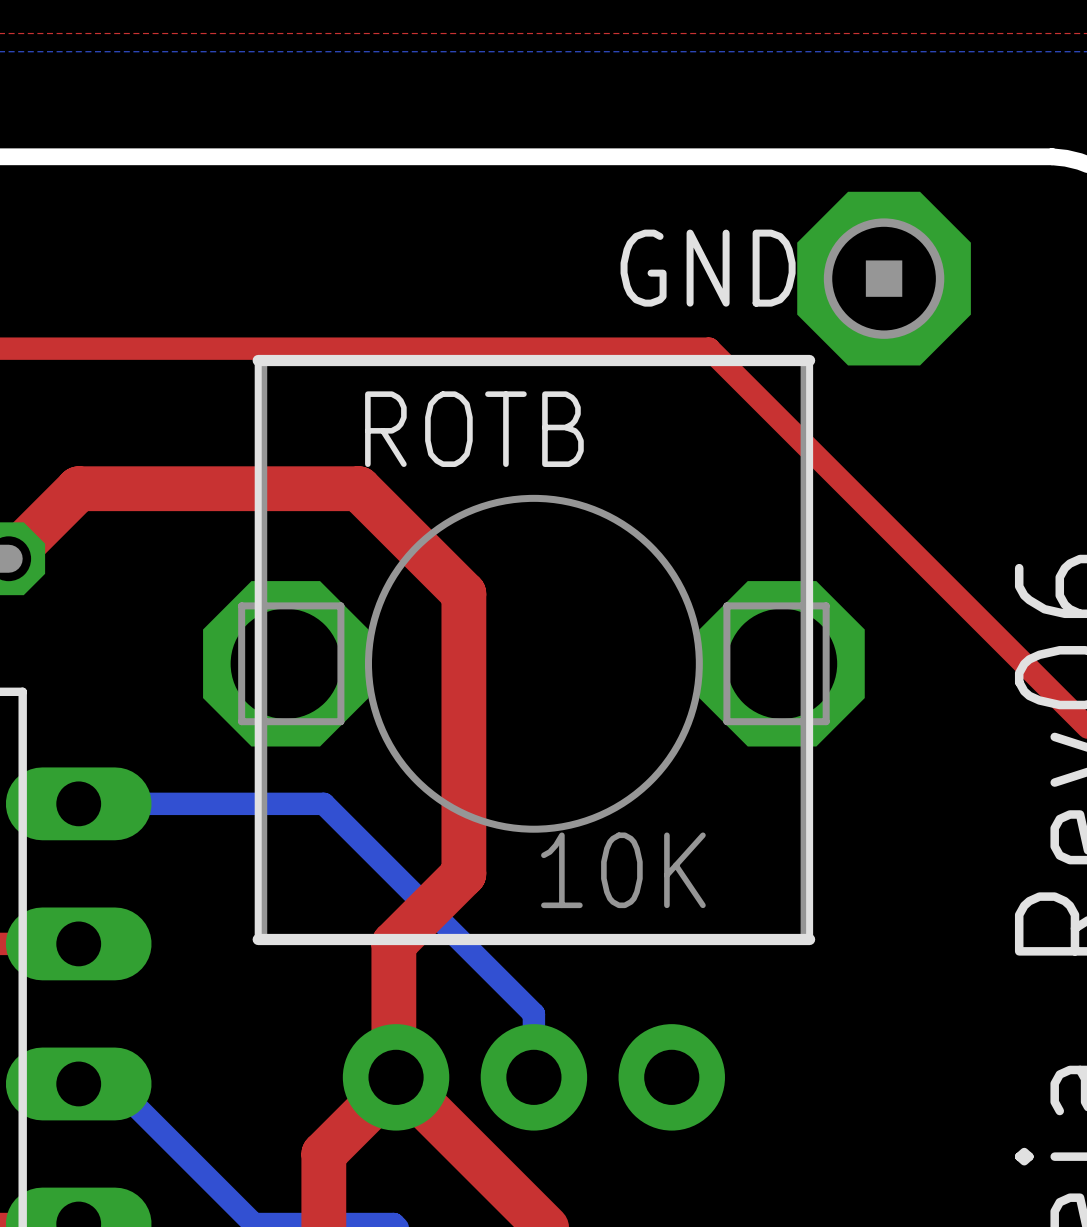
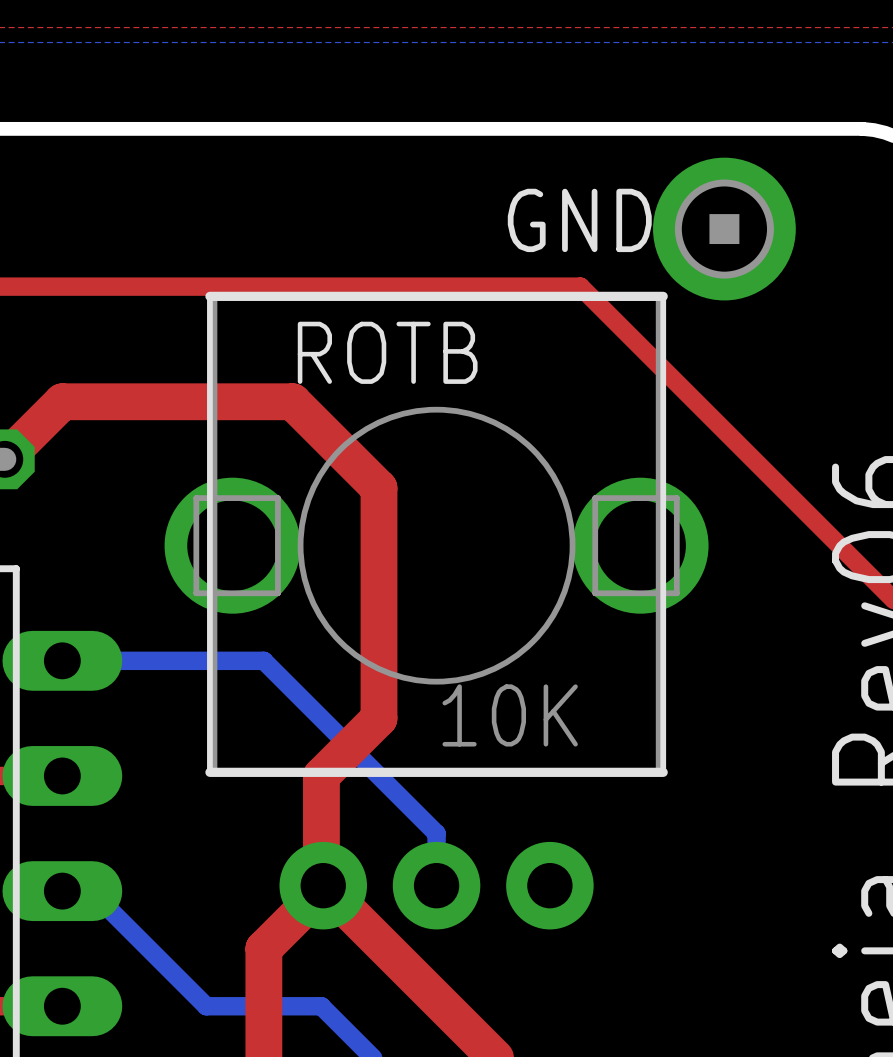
GND footprint: [797, 191, 971, 366] -> [653, 157, 796, 301]
ROTB footprint: [203, 354, 865, 1131] -> [164, 291, 709, 930]

